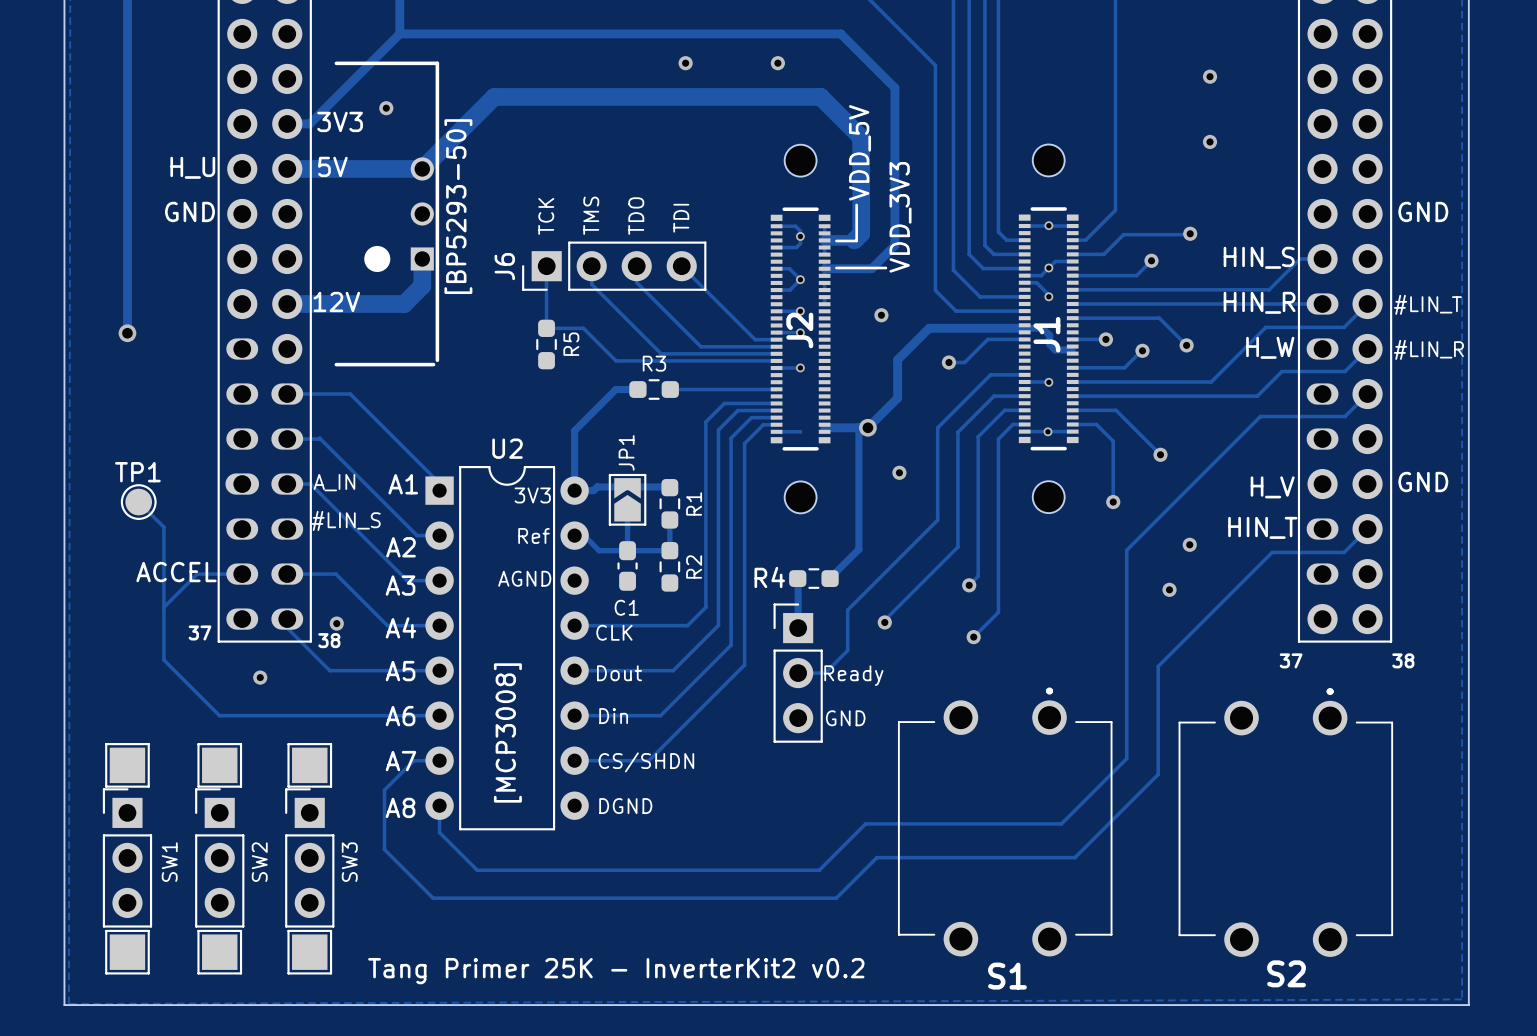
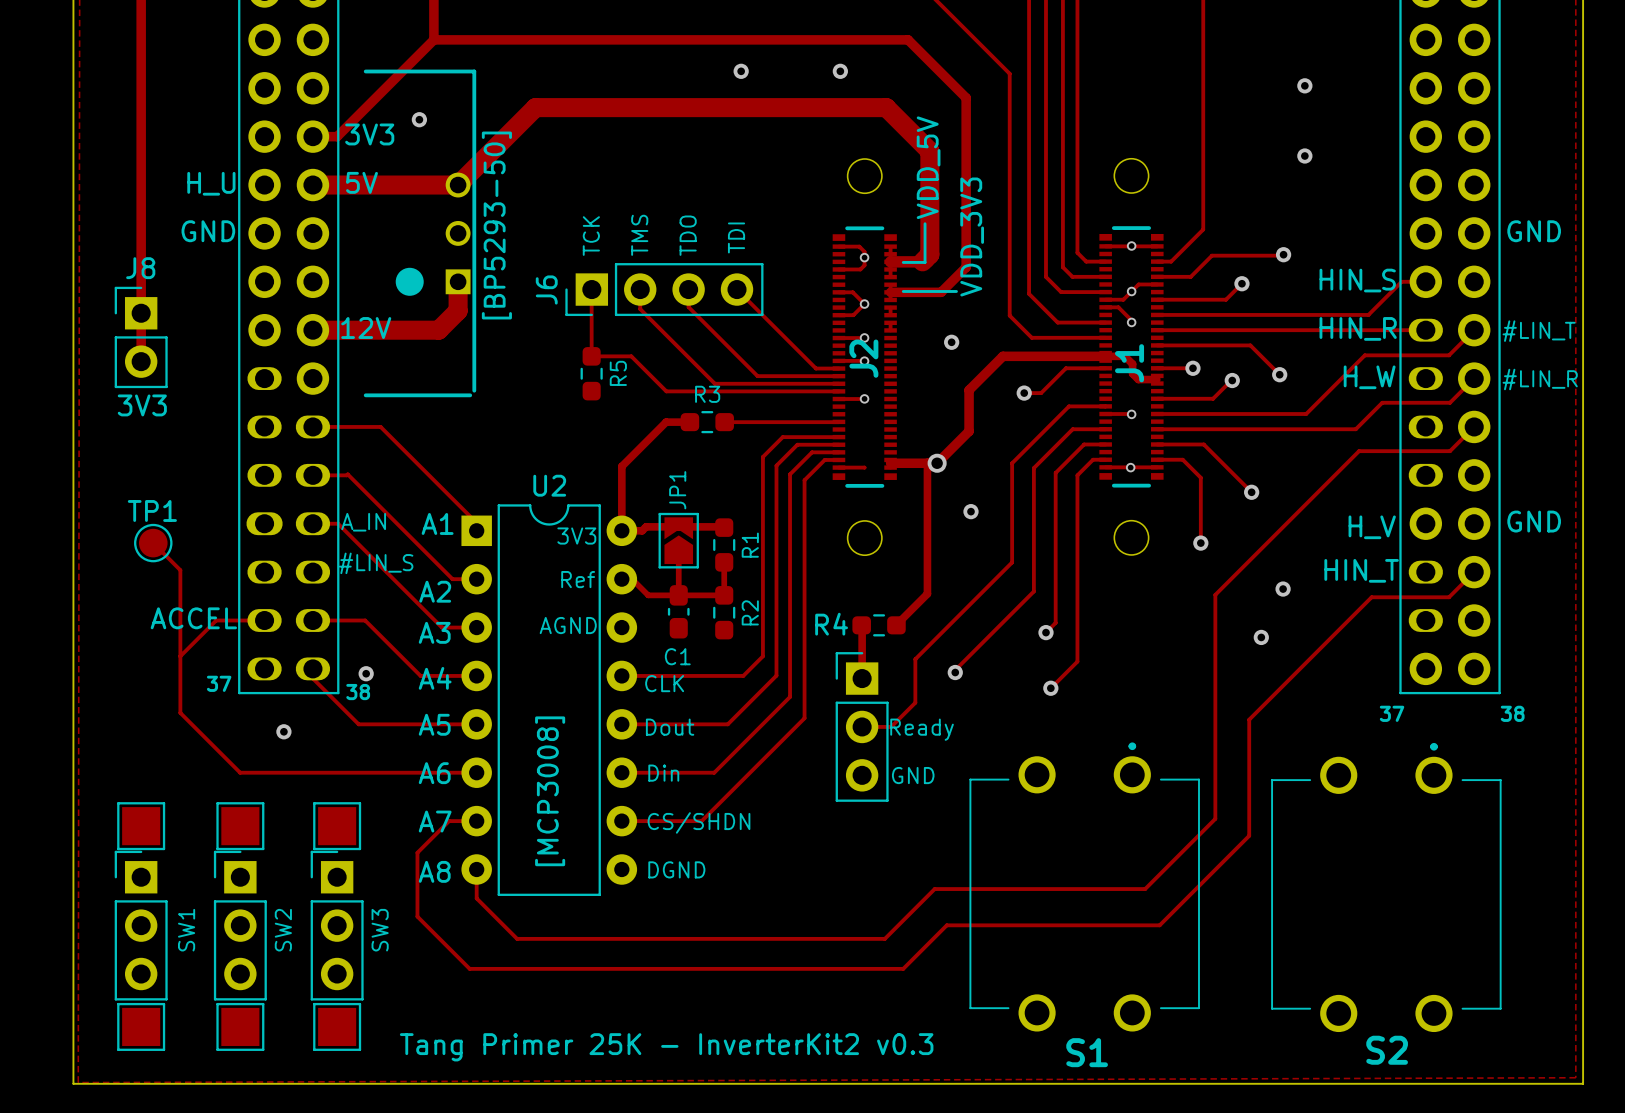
J8: none -> (141, 337)
via: (127, 333) -> none
text: none -> 3V3 (142, 405)
text: Tang Primer 25K - InverterKit2 v0.2 (616, 971) -> Tang Primer 25K - InverterKit2 v0.3 (666, 1047)

